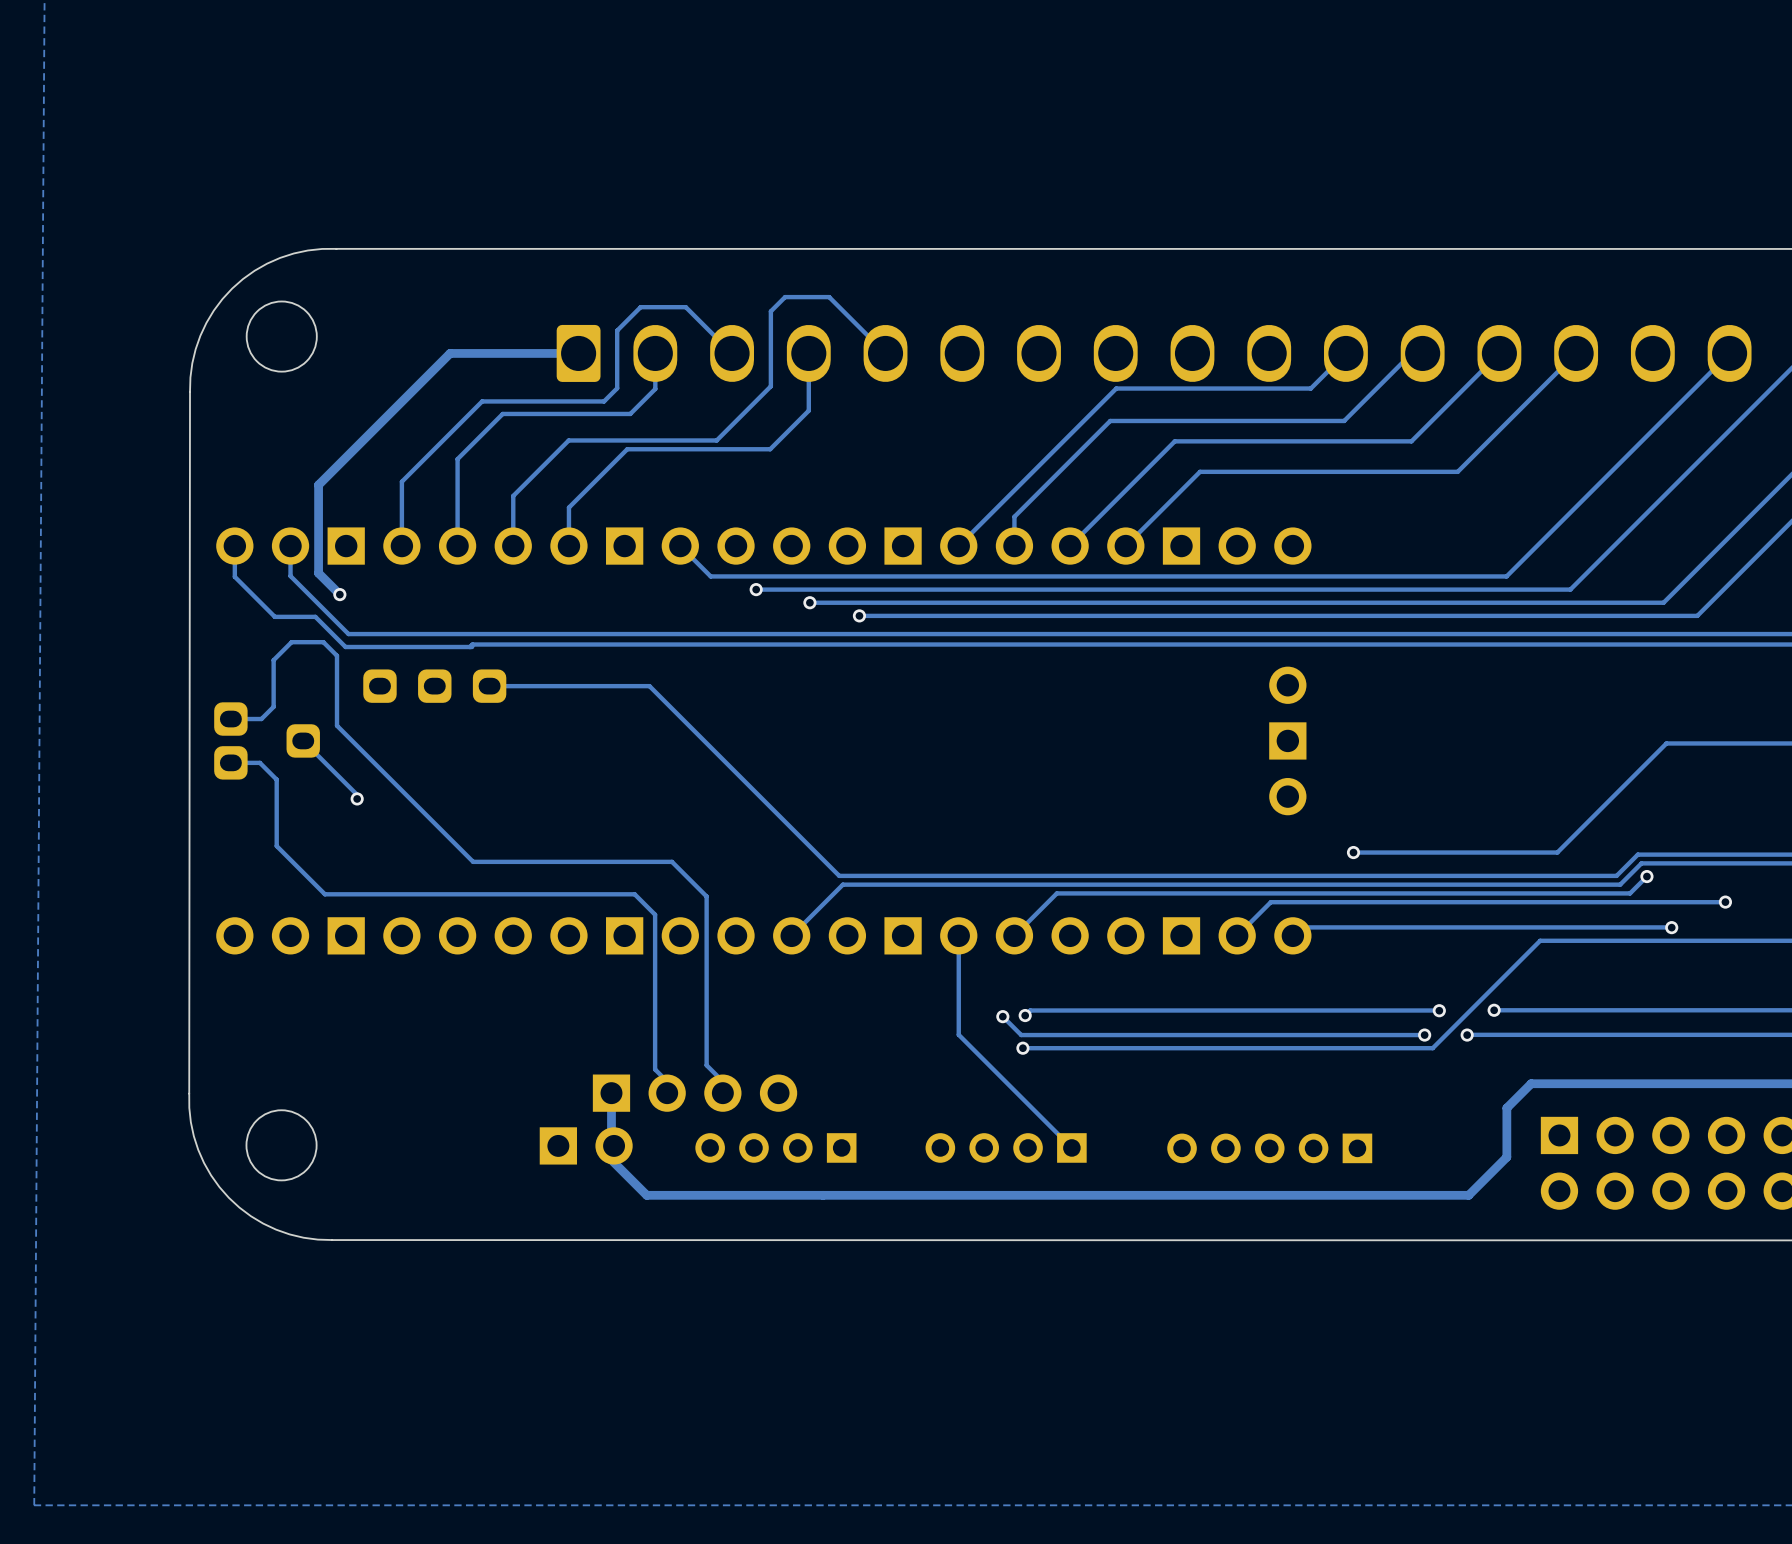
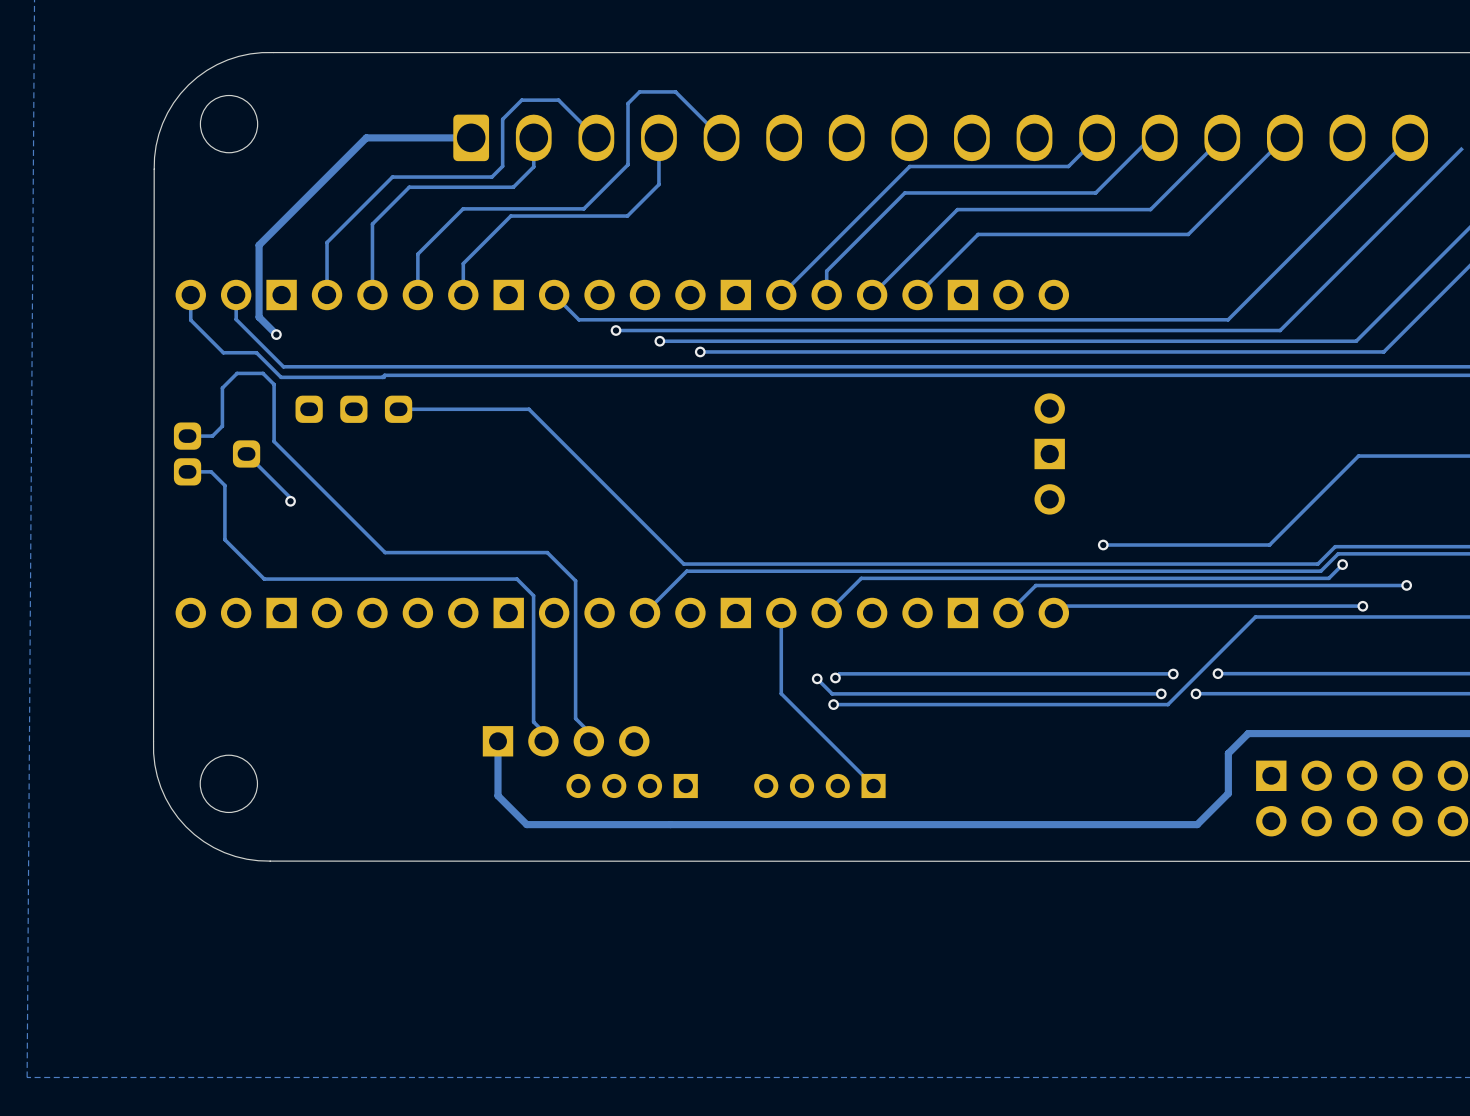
part: (586, 1145) -> none
part: (1269, 1148) -> none

